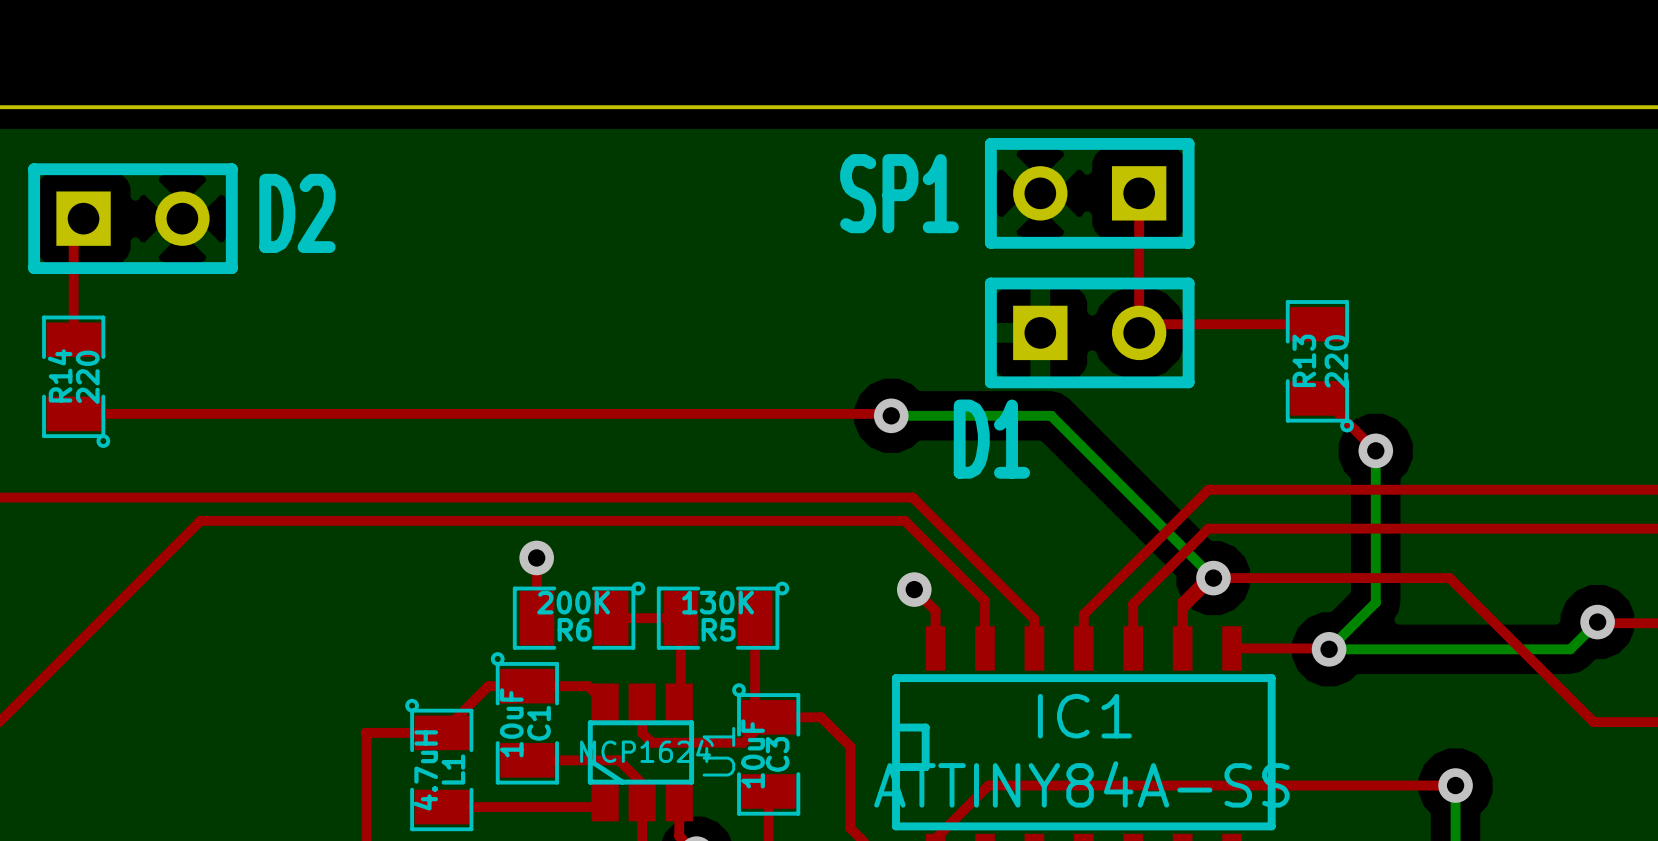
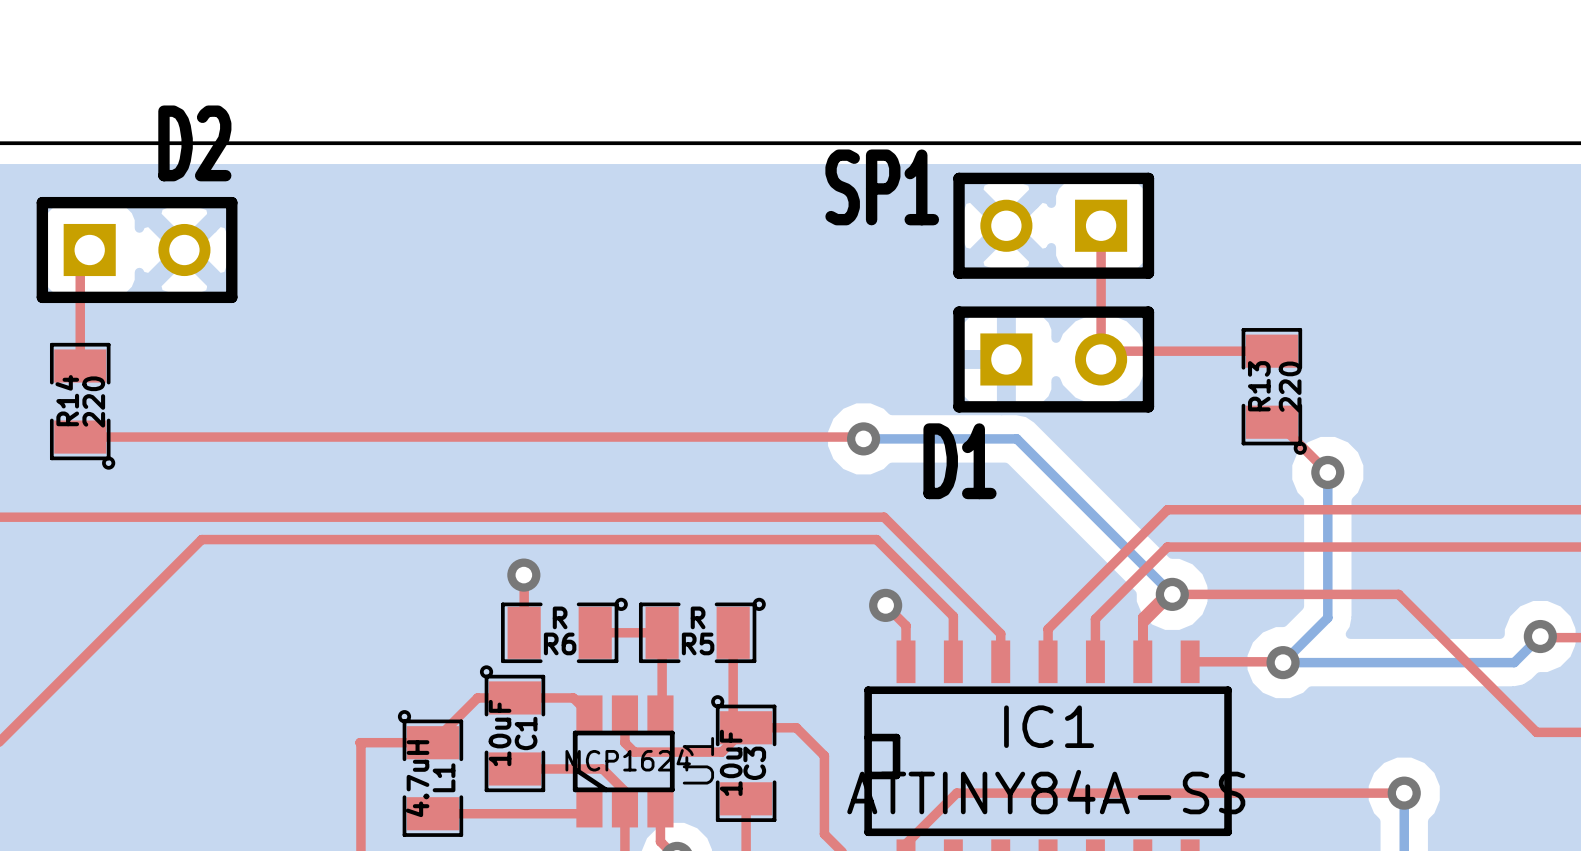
SP1 name position: SP1 (899, 193) -> SP1 (882, 187)
D2 name position: D2 (297, 213) -> D2 (194, 143)
R6 value: 200K (573, 602) -> R (560, 617)
R5 value: 130K (718, 602) -> R (698, 617)

